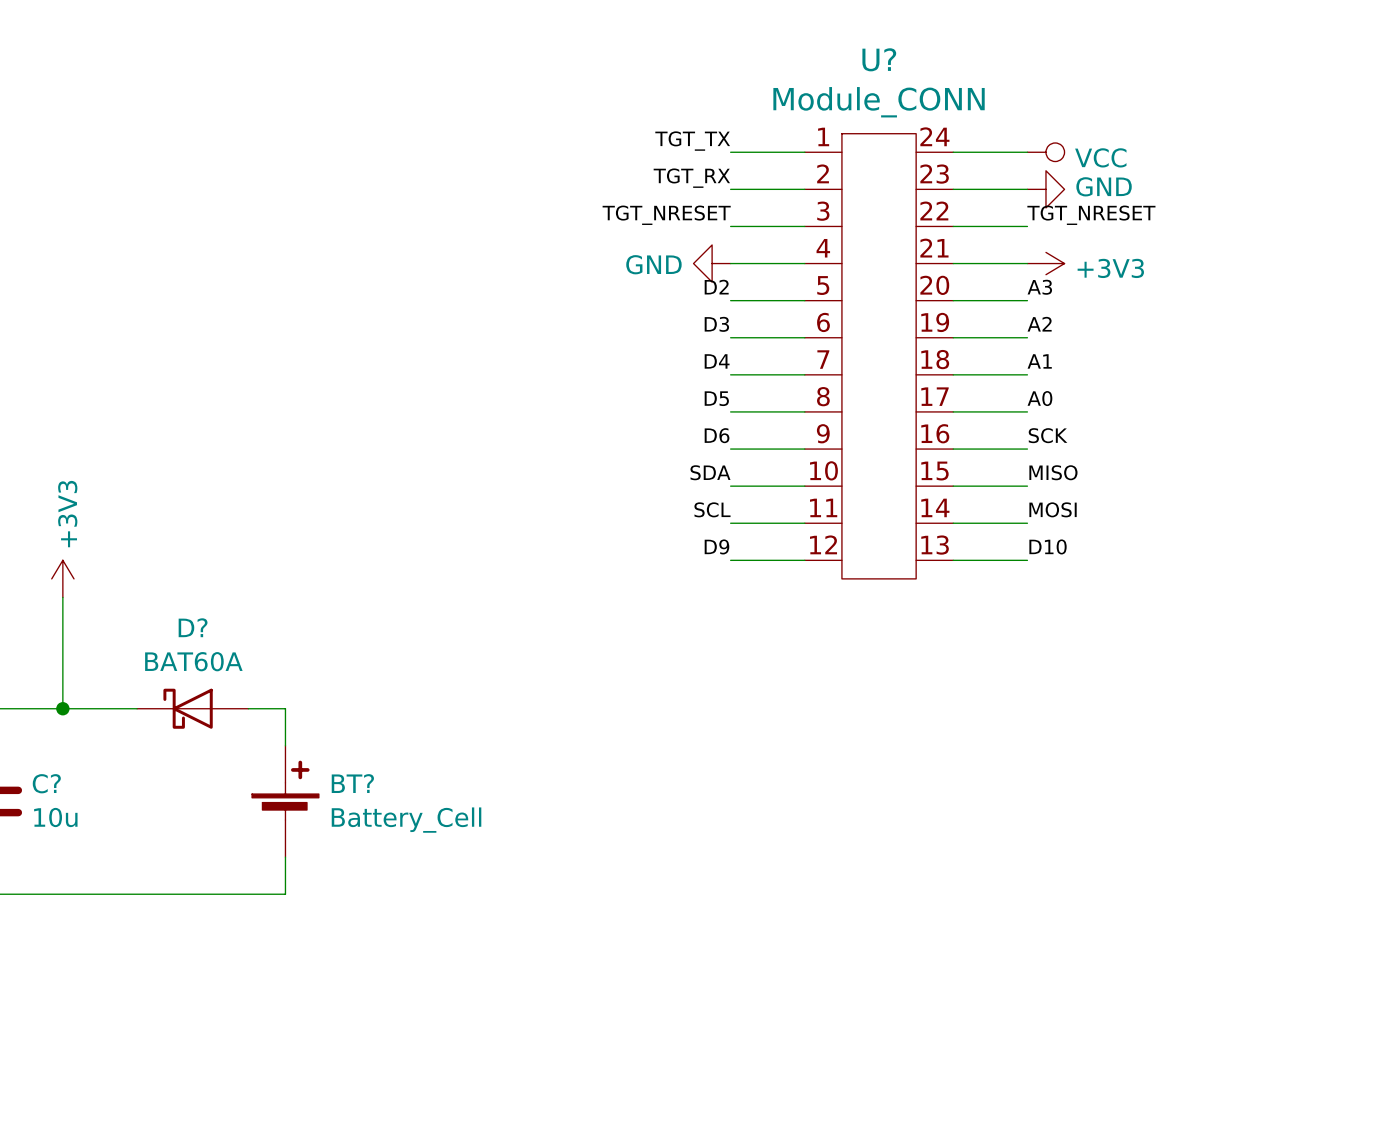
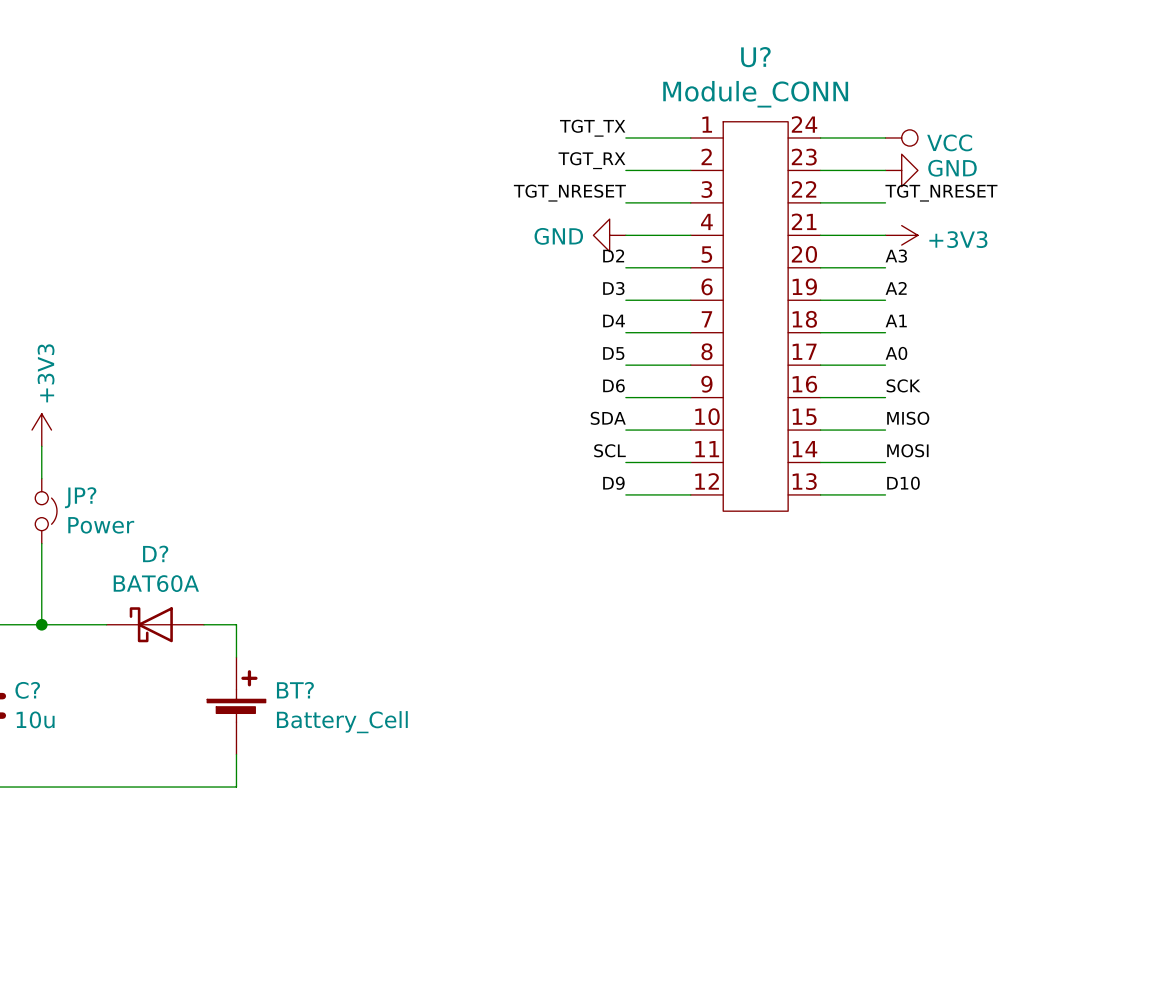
wire: none -> (41, 446) (41, 478)
power symbol position: +3V3 (62, 578) -> +3V3 (41, 430)
JP?: none -> Power (46, 511)

